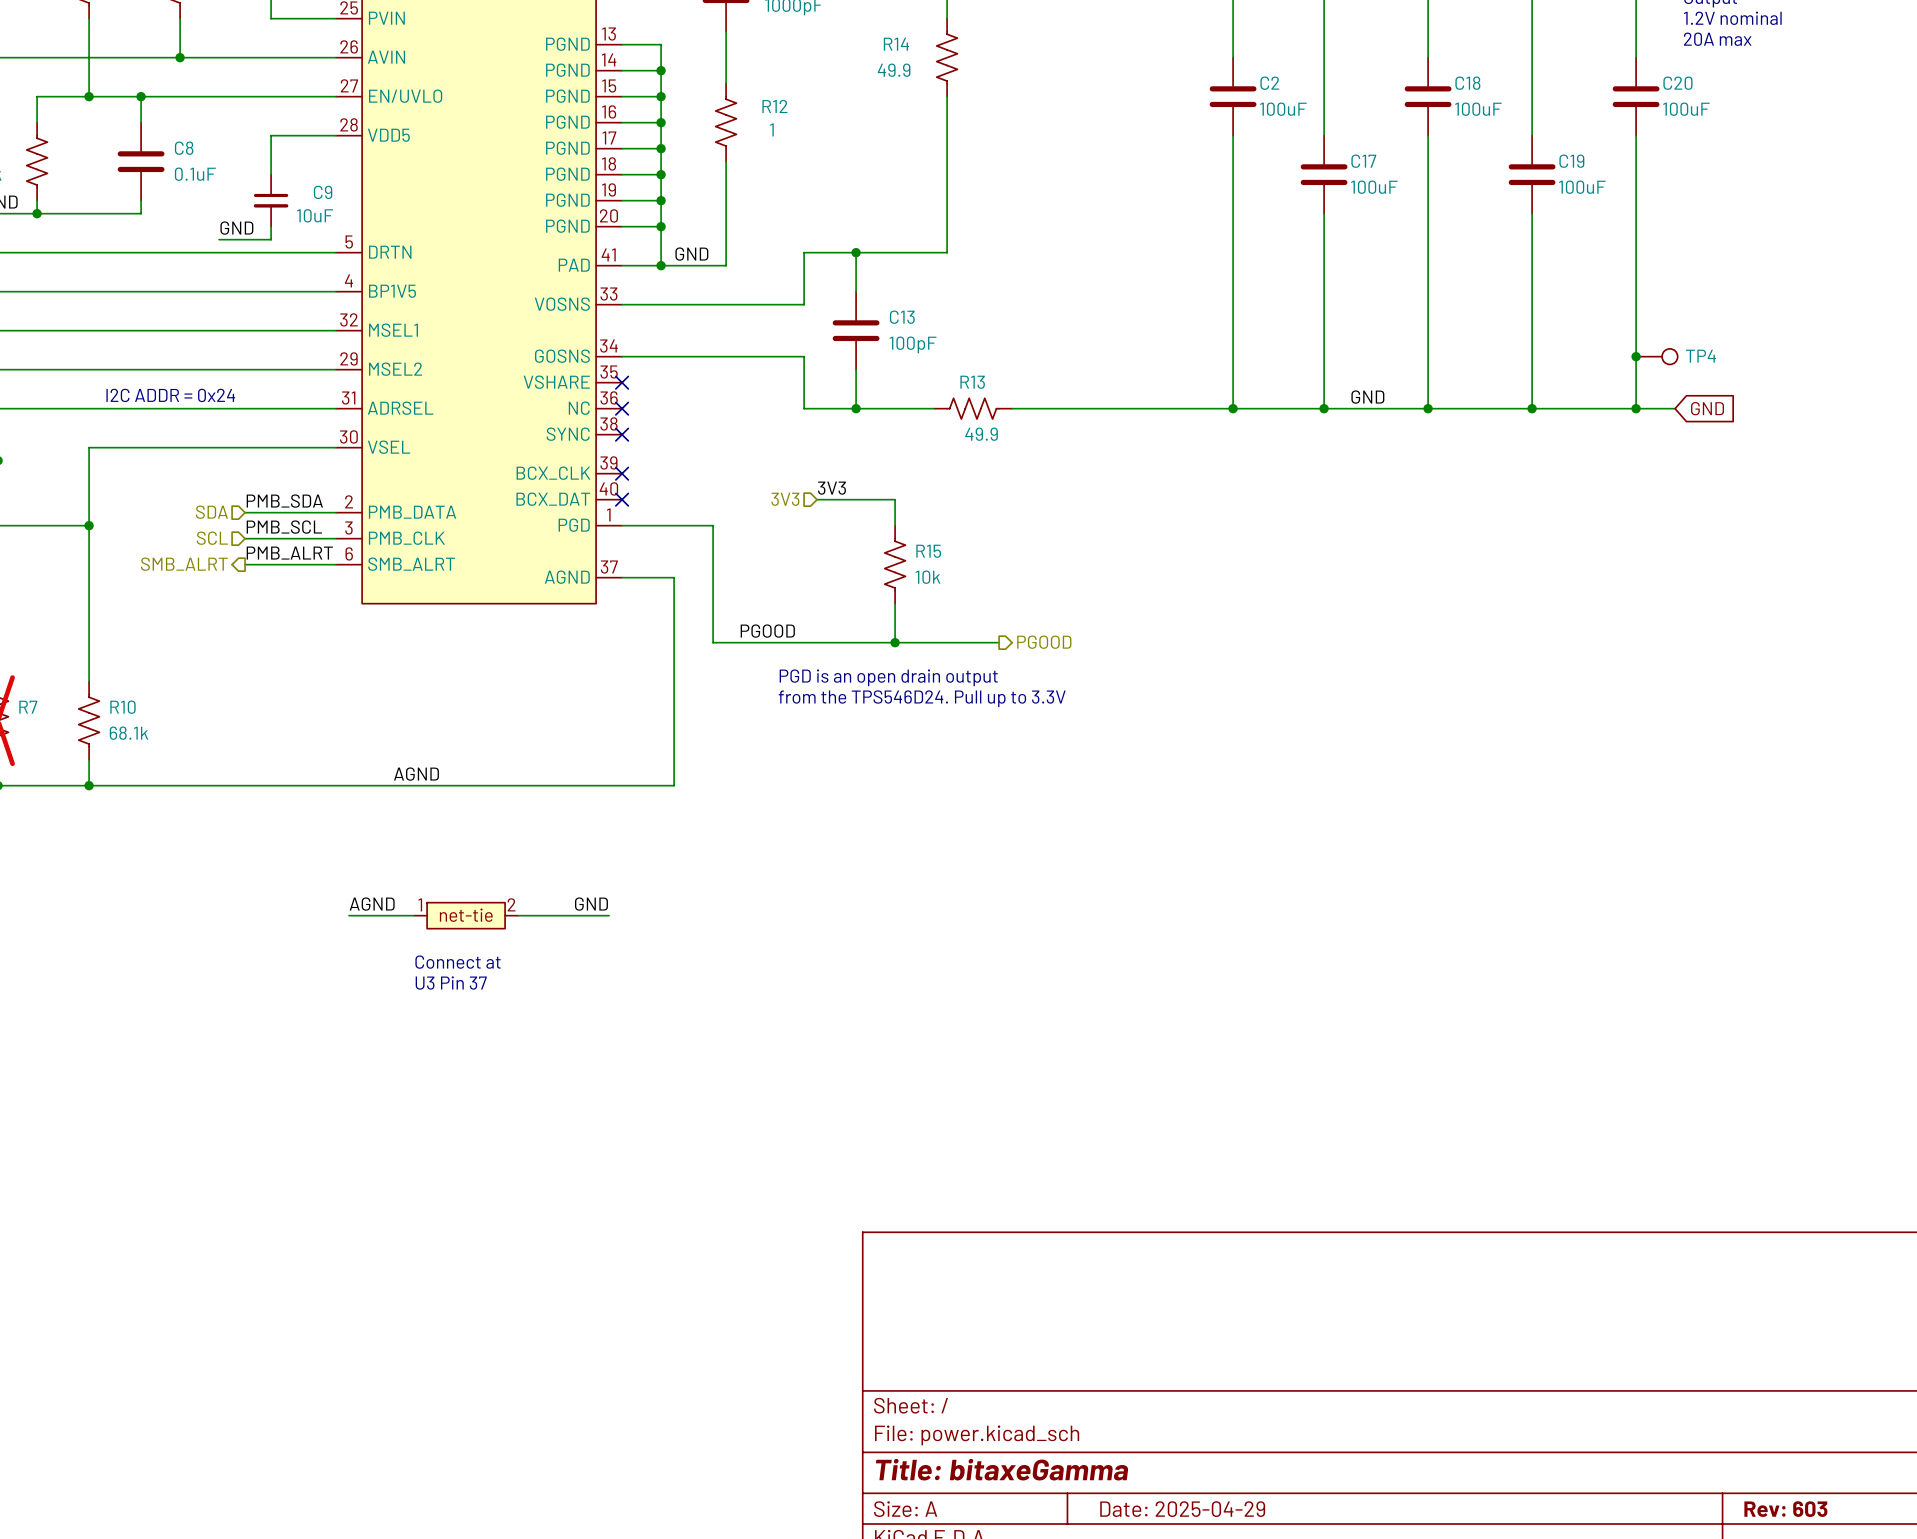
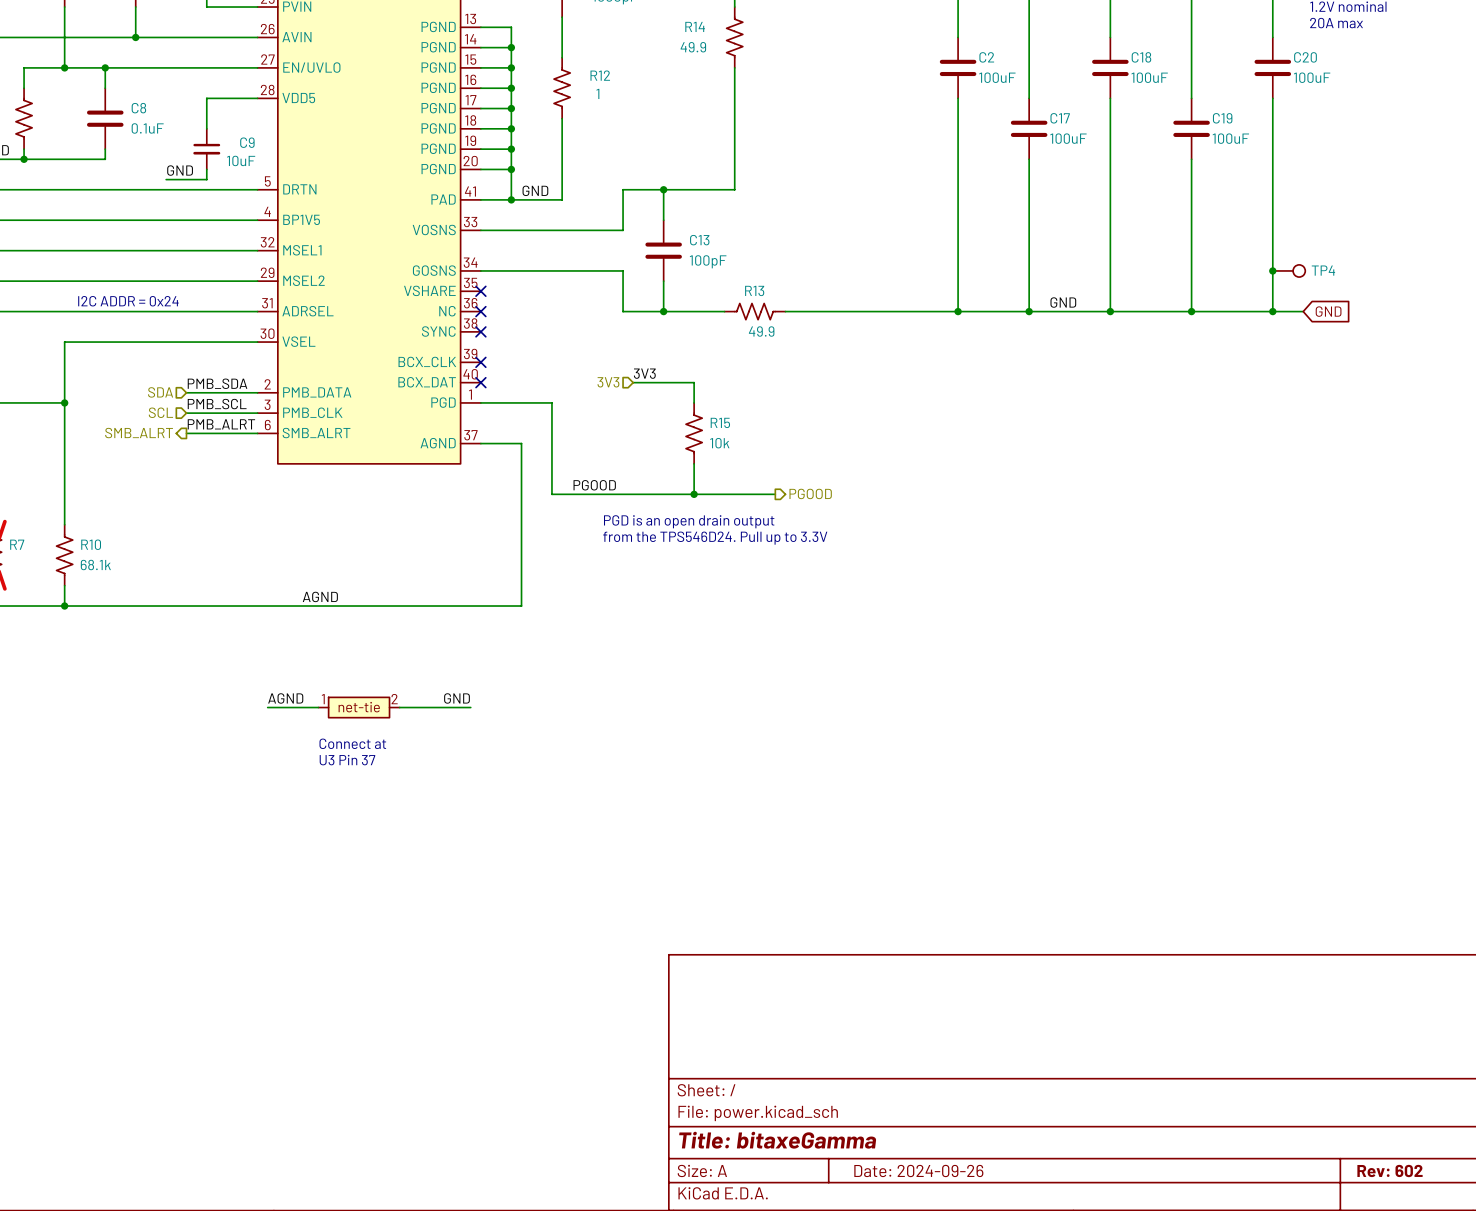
title block: Date: 2025-04-29 (1182, 1509) -> Date: 2024-09-26 (918, 1170)
title block: Rev: 603 (1785, 1509) -> Rev: 602 (1390, 1171)

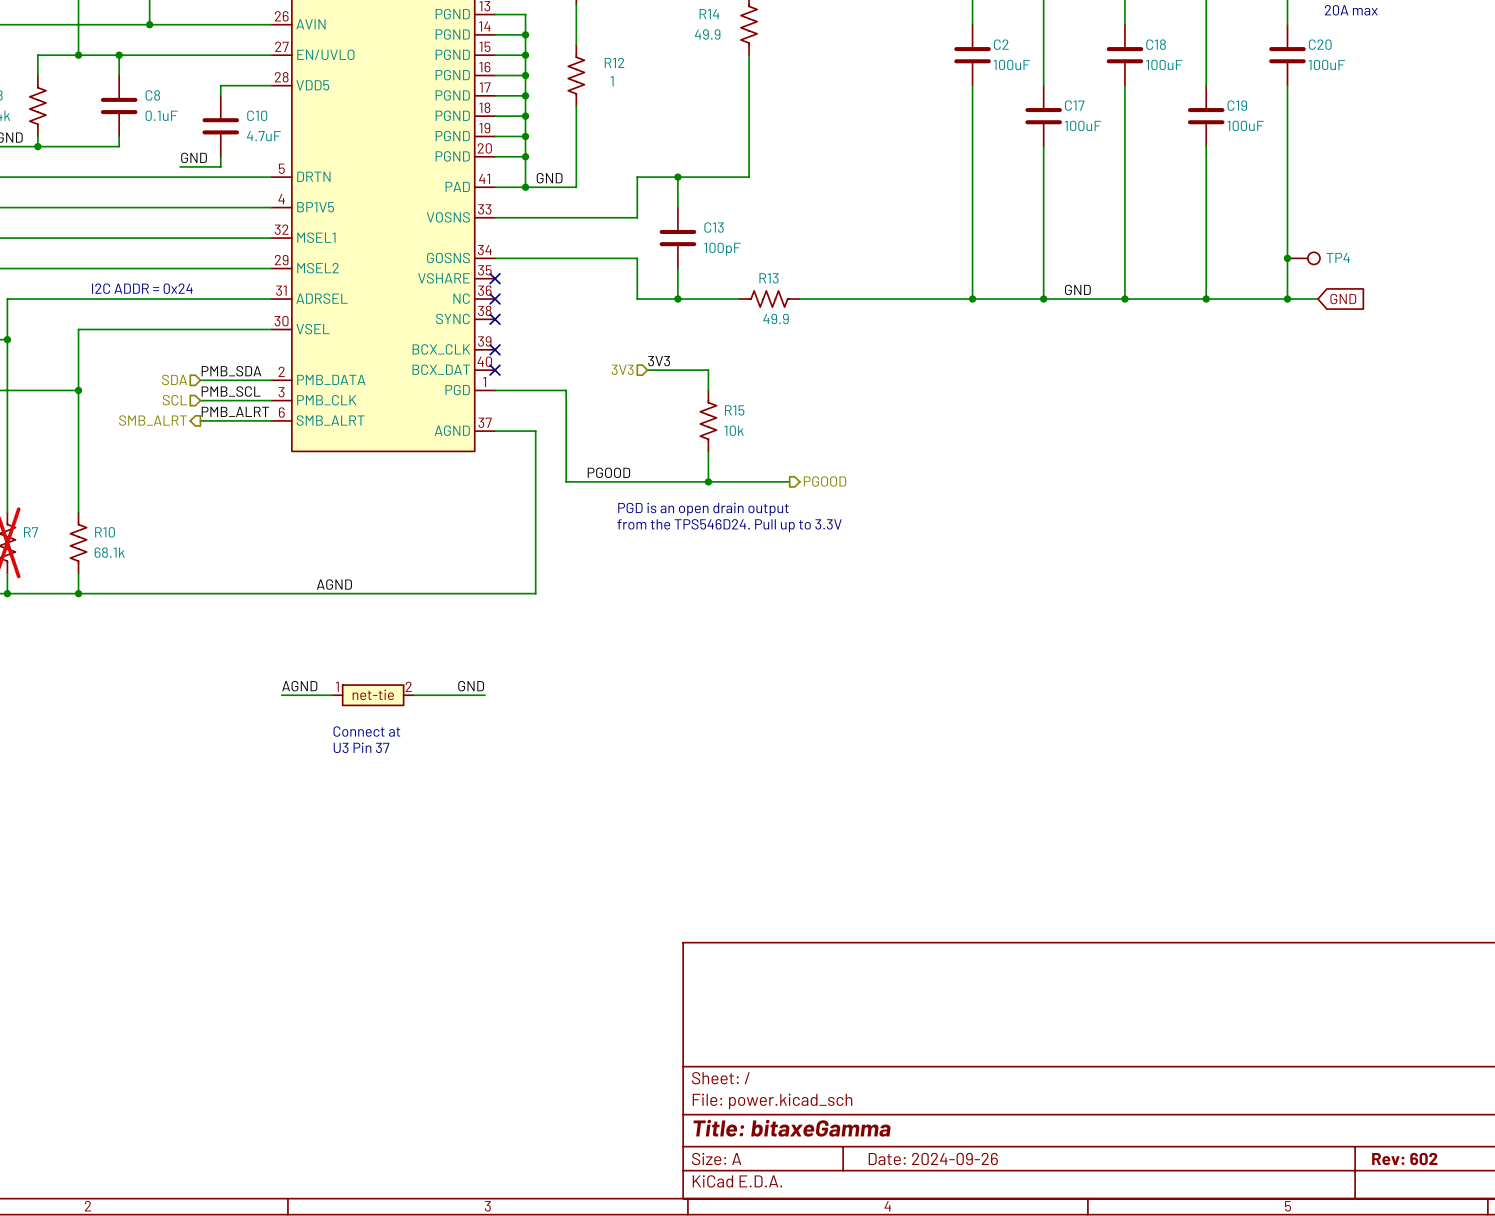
C10: none -> 4.7uF (220, 126)
C9: 10uF (206, 149) -> none

